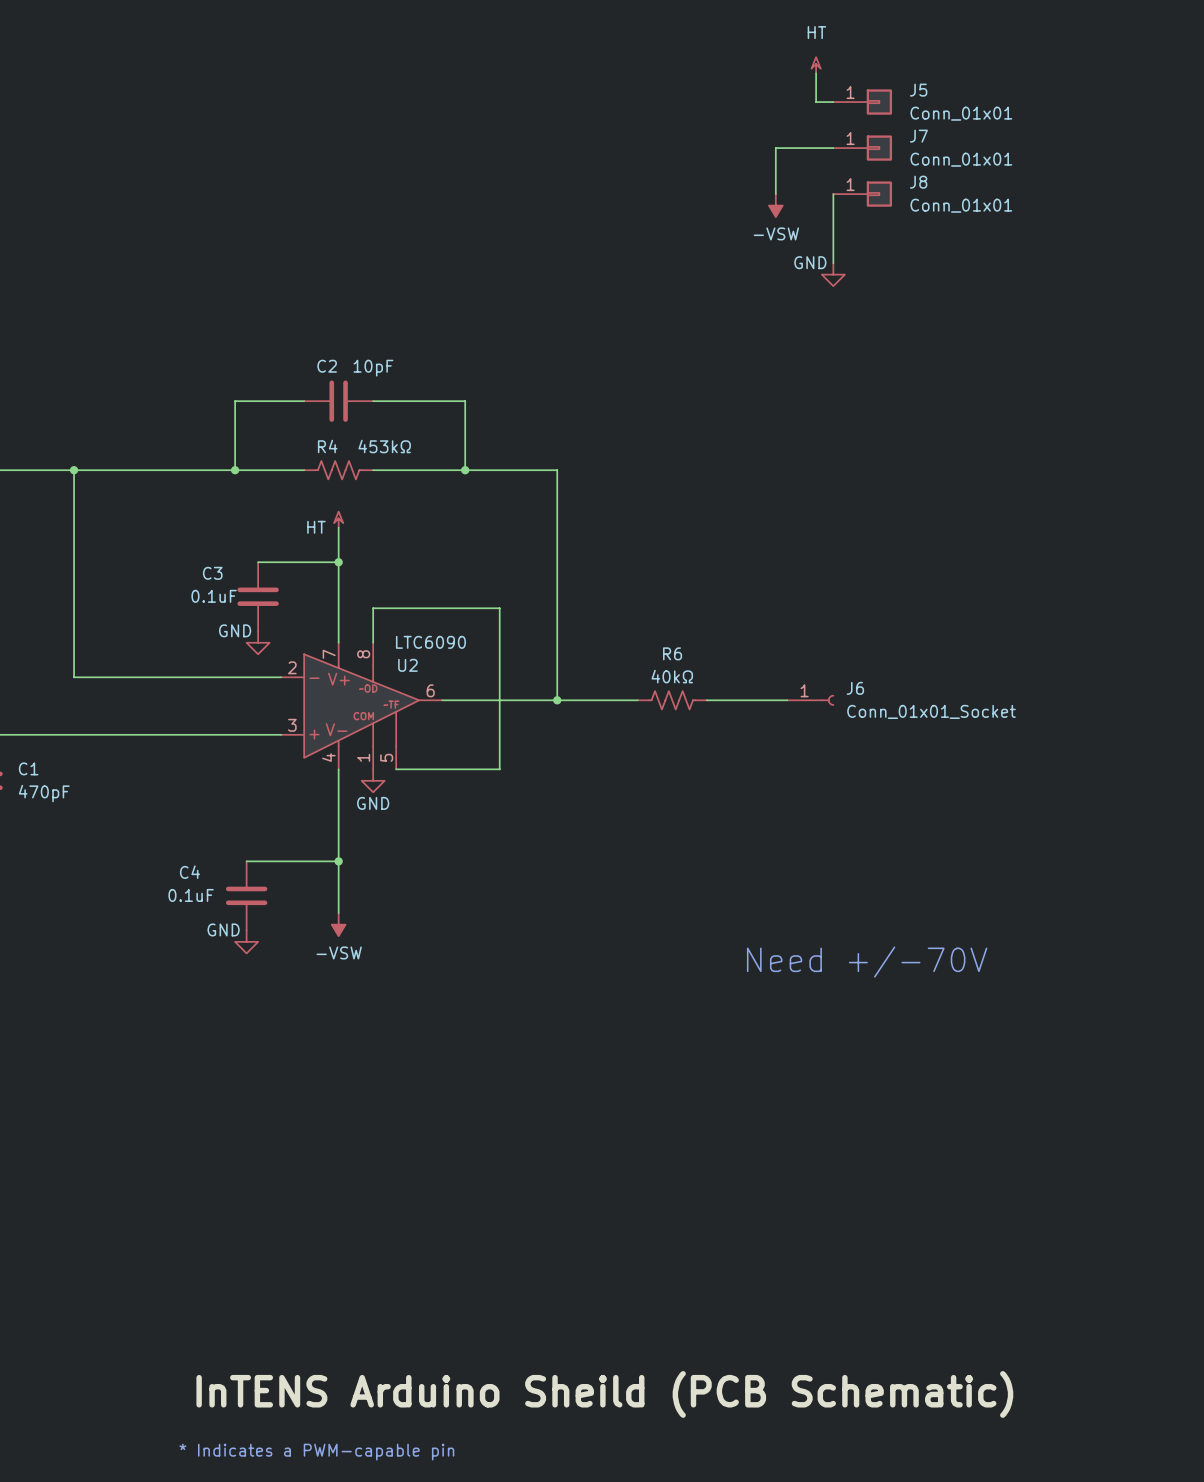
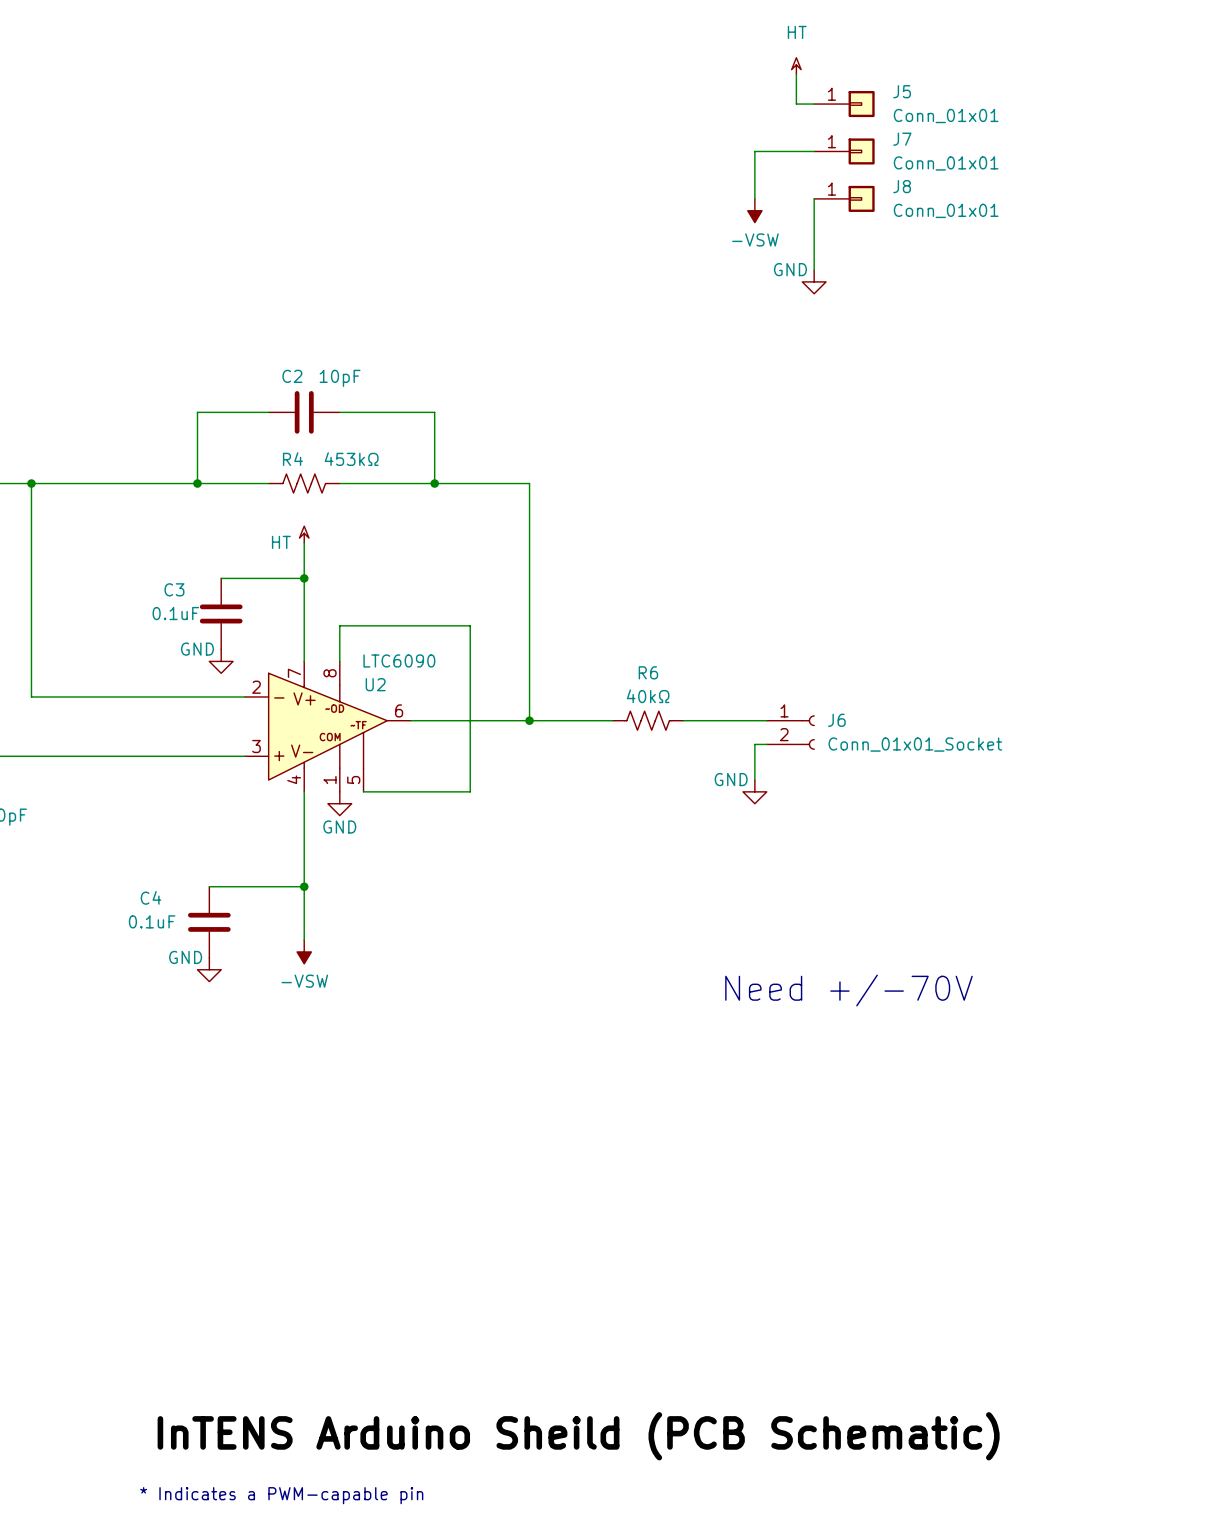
J6 symbol: [787, 695, 835, 706] -> [766, 715, 815, 750]
wire: none -> (766, 744) (754, 744) (754, 780)
power symbol: none -> GND (754, 791)

